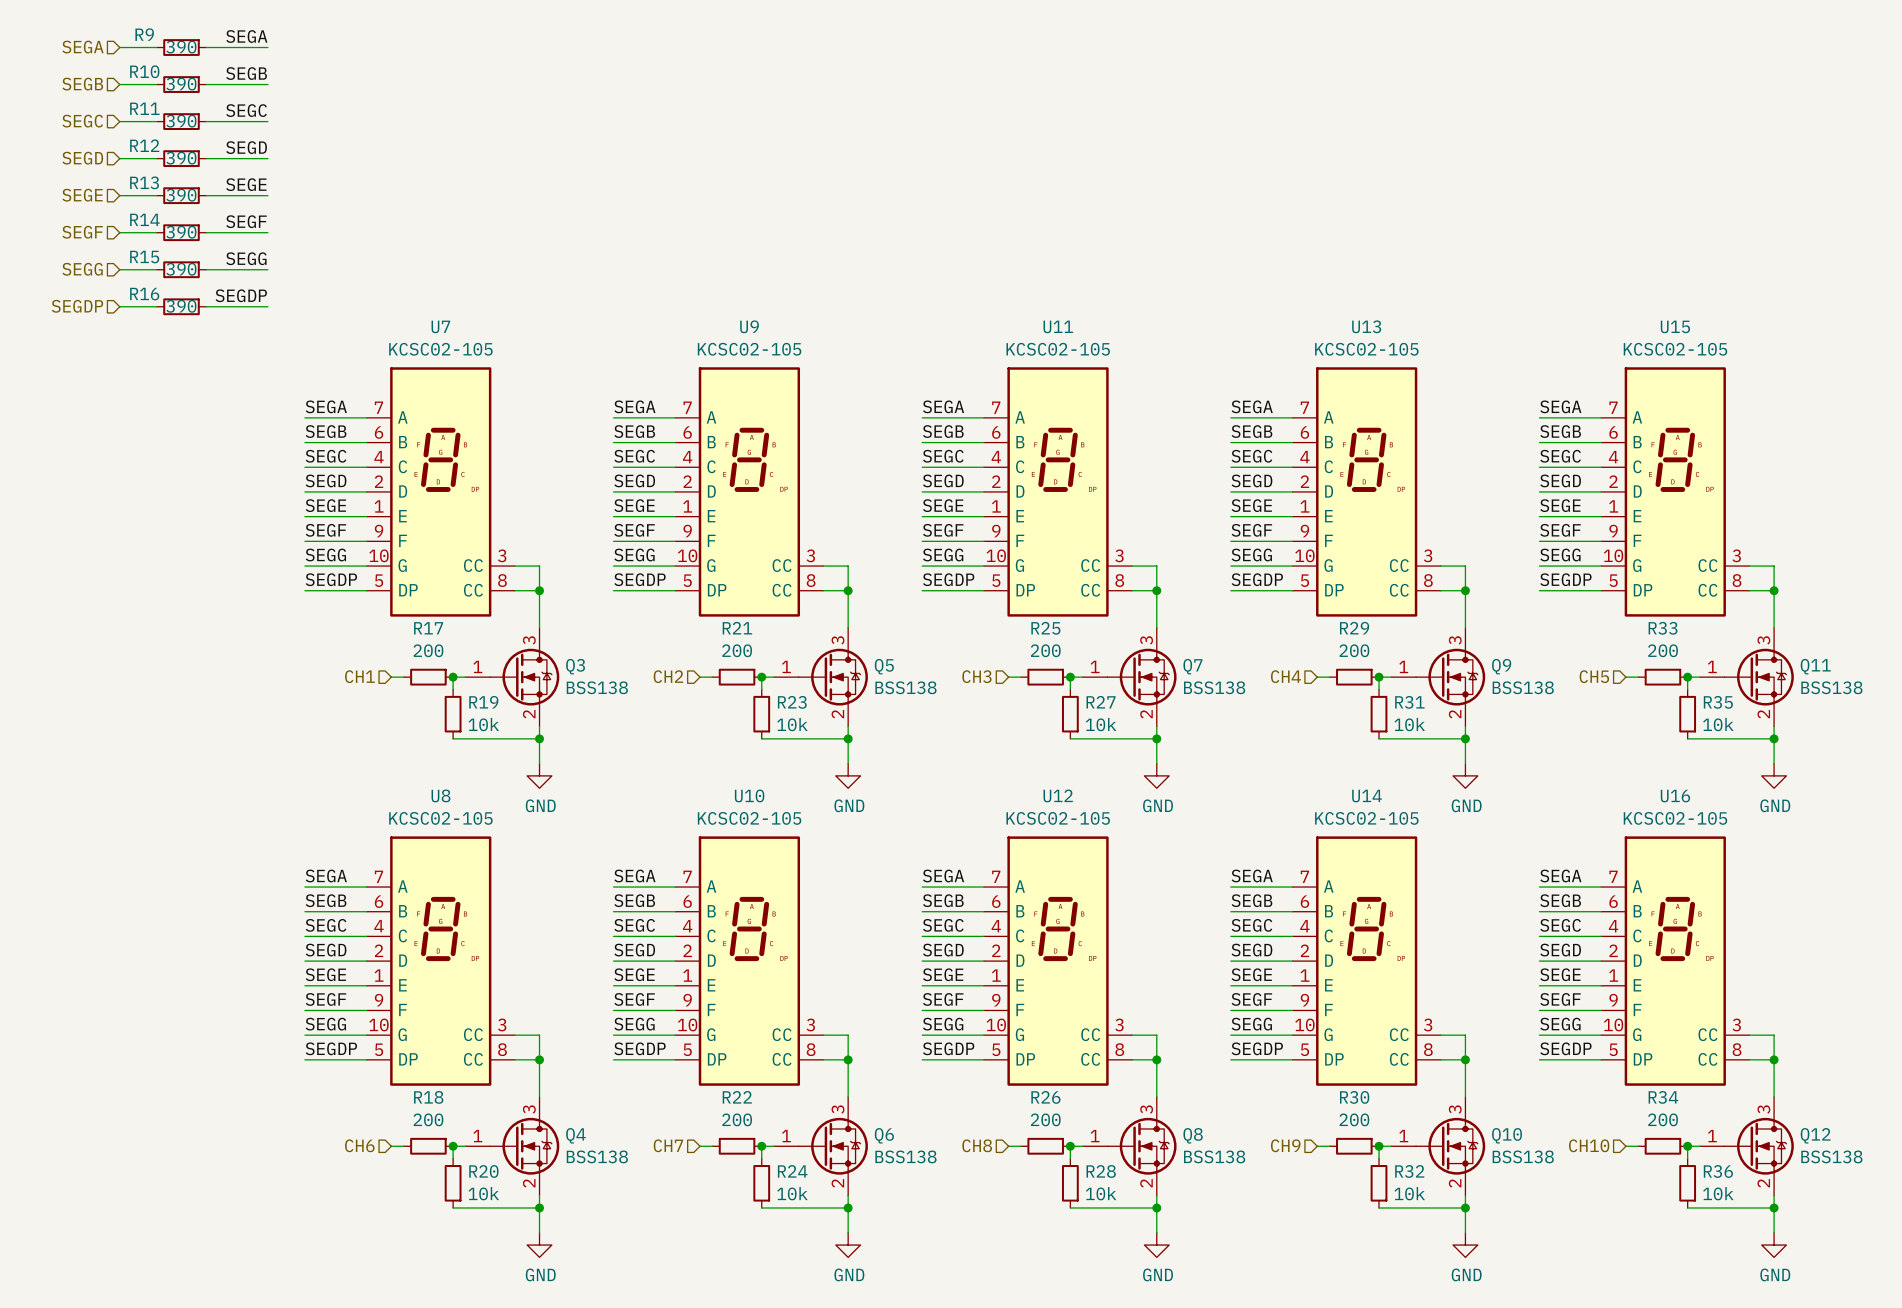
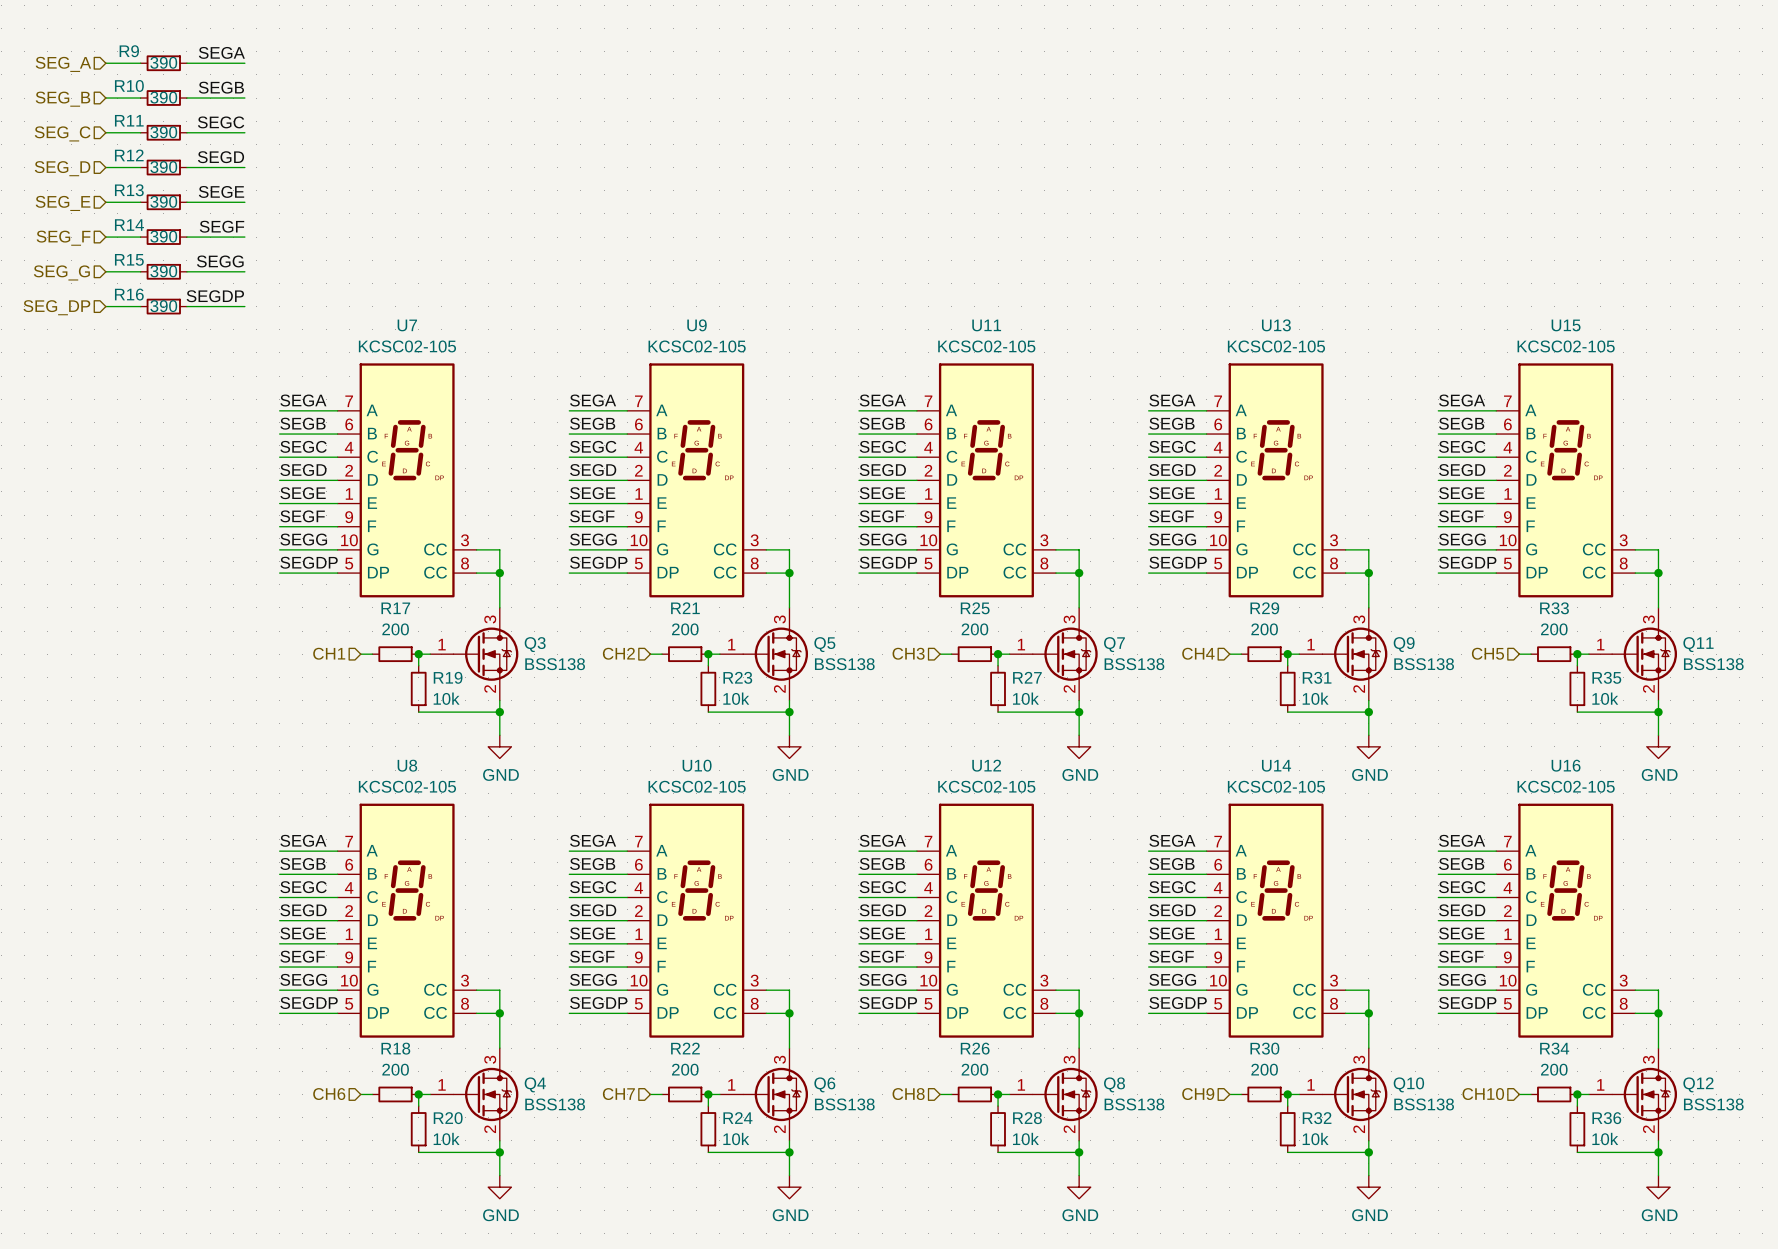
hierarchical label: SEGA (83, 47) -> SEG_A (63, 64)
hierarchical label: SEGB (82, 84) -> SEG_B (62, 99)
hierarchical label: SEGC (82, 121) -> SEG_C (62, 133)
hierarchical label: SEGD (82, 158) -> SEG_D (62, 168)
hierarchical label: SEGE (82, 195) -> SEG_E (63, 203)
hierarchical label: SEGF (82, 232) -> SEG_F (63, 238)
hierarchical label: SEGG (82, 269) -> SEG_G (61, 272)
hierarchical label: SEGDP (77, 306) -> SEG_DP (56, 307)

